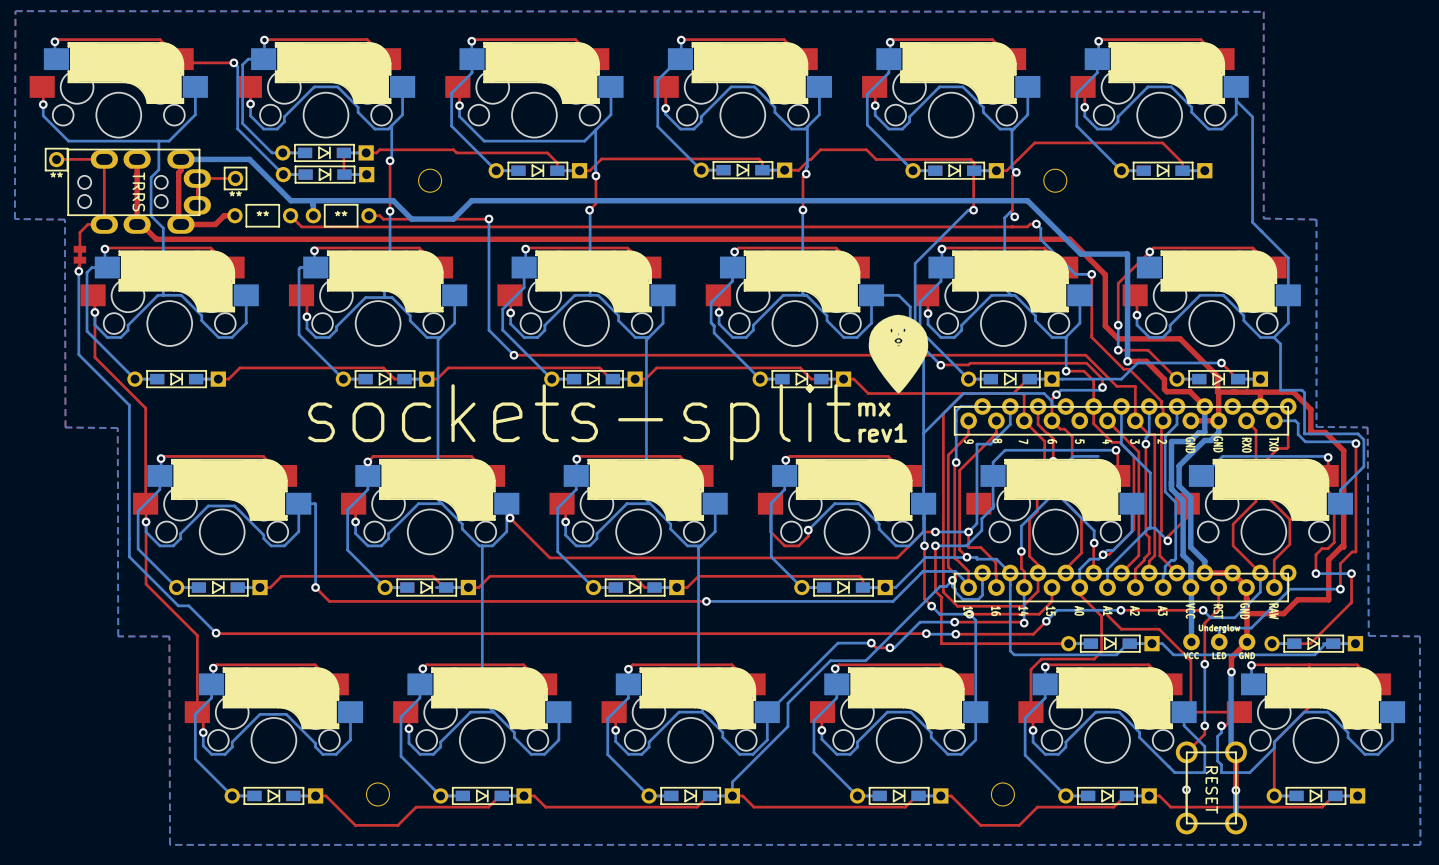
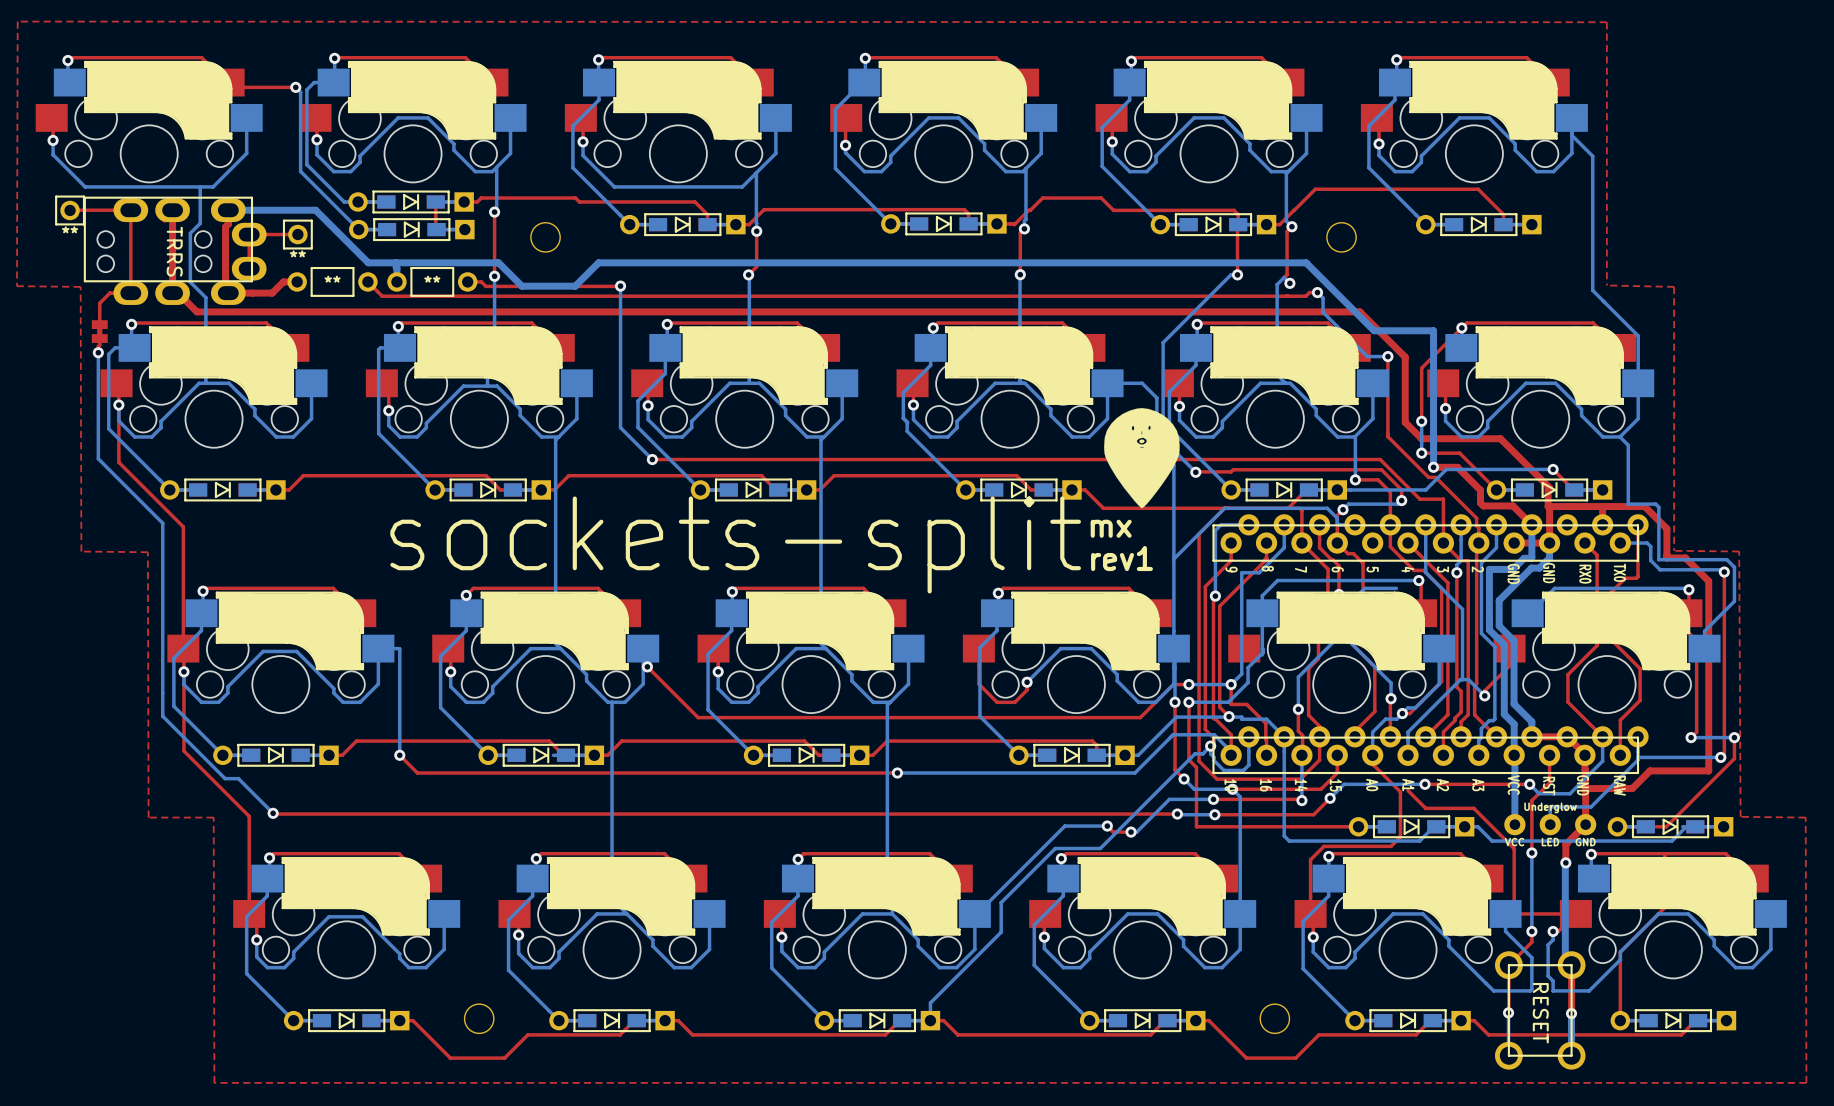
bottom zone outline: (15, 11) (14, 219) (64, 219) (65, 427) (117, 428) (118, 636) (169, 636) (169, 844) (1420, 844) (1419, 636) (1368, 635) (1367, 427) (1316, 426) (1316, 219) (1263, 218) (1263, 11) (15, 11) -> none
top track: (1334, 542) (1328, 548) (1322, 548) (1315, 554) (1315, 573) -> (1696, 697) (1696, 732) (1691, 737)
top track: (1343, 546) (1328, 559) (1328, 599) -> (1708, 703) (1708, 770) (1689, 770)
top track: (1355, 551) (1352, 551) (1340, 563) (1340, 589) -> (1724, 710) (1724, 753) (1720, 757)
via: (1315, 573) -> none
bottom track: (1329, 573) (1316, 573) -> (1734, 737) (1717, 737)
via: none -> (1691, 737)
top track: (1351, 573) (1351, 602) -> (1734, 758) (1718, 774)
via: (1351, 573) -> none
top track: none -> (1734, 737) (1734, 758)
via: none -> (1734, 737)
via: (1340, 589) -> none
bottom track: none -> (1720, 757) (1704, 757)
via: none -> (1720, 757)

